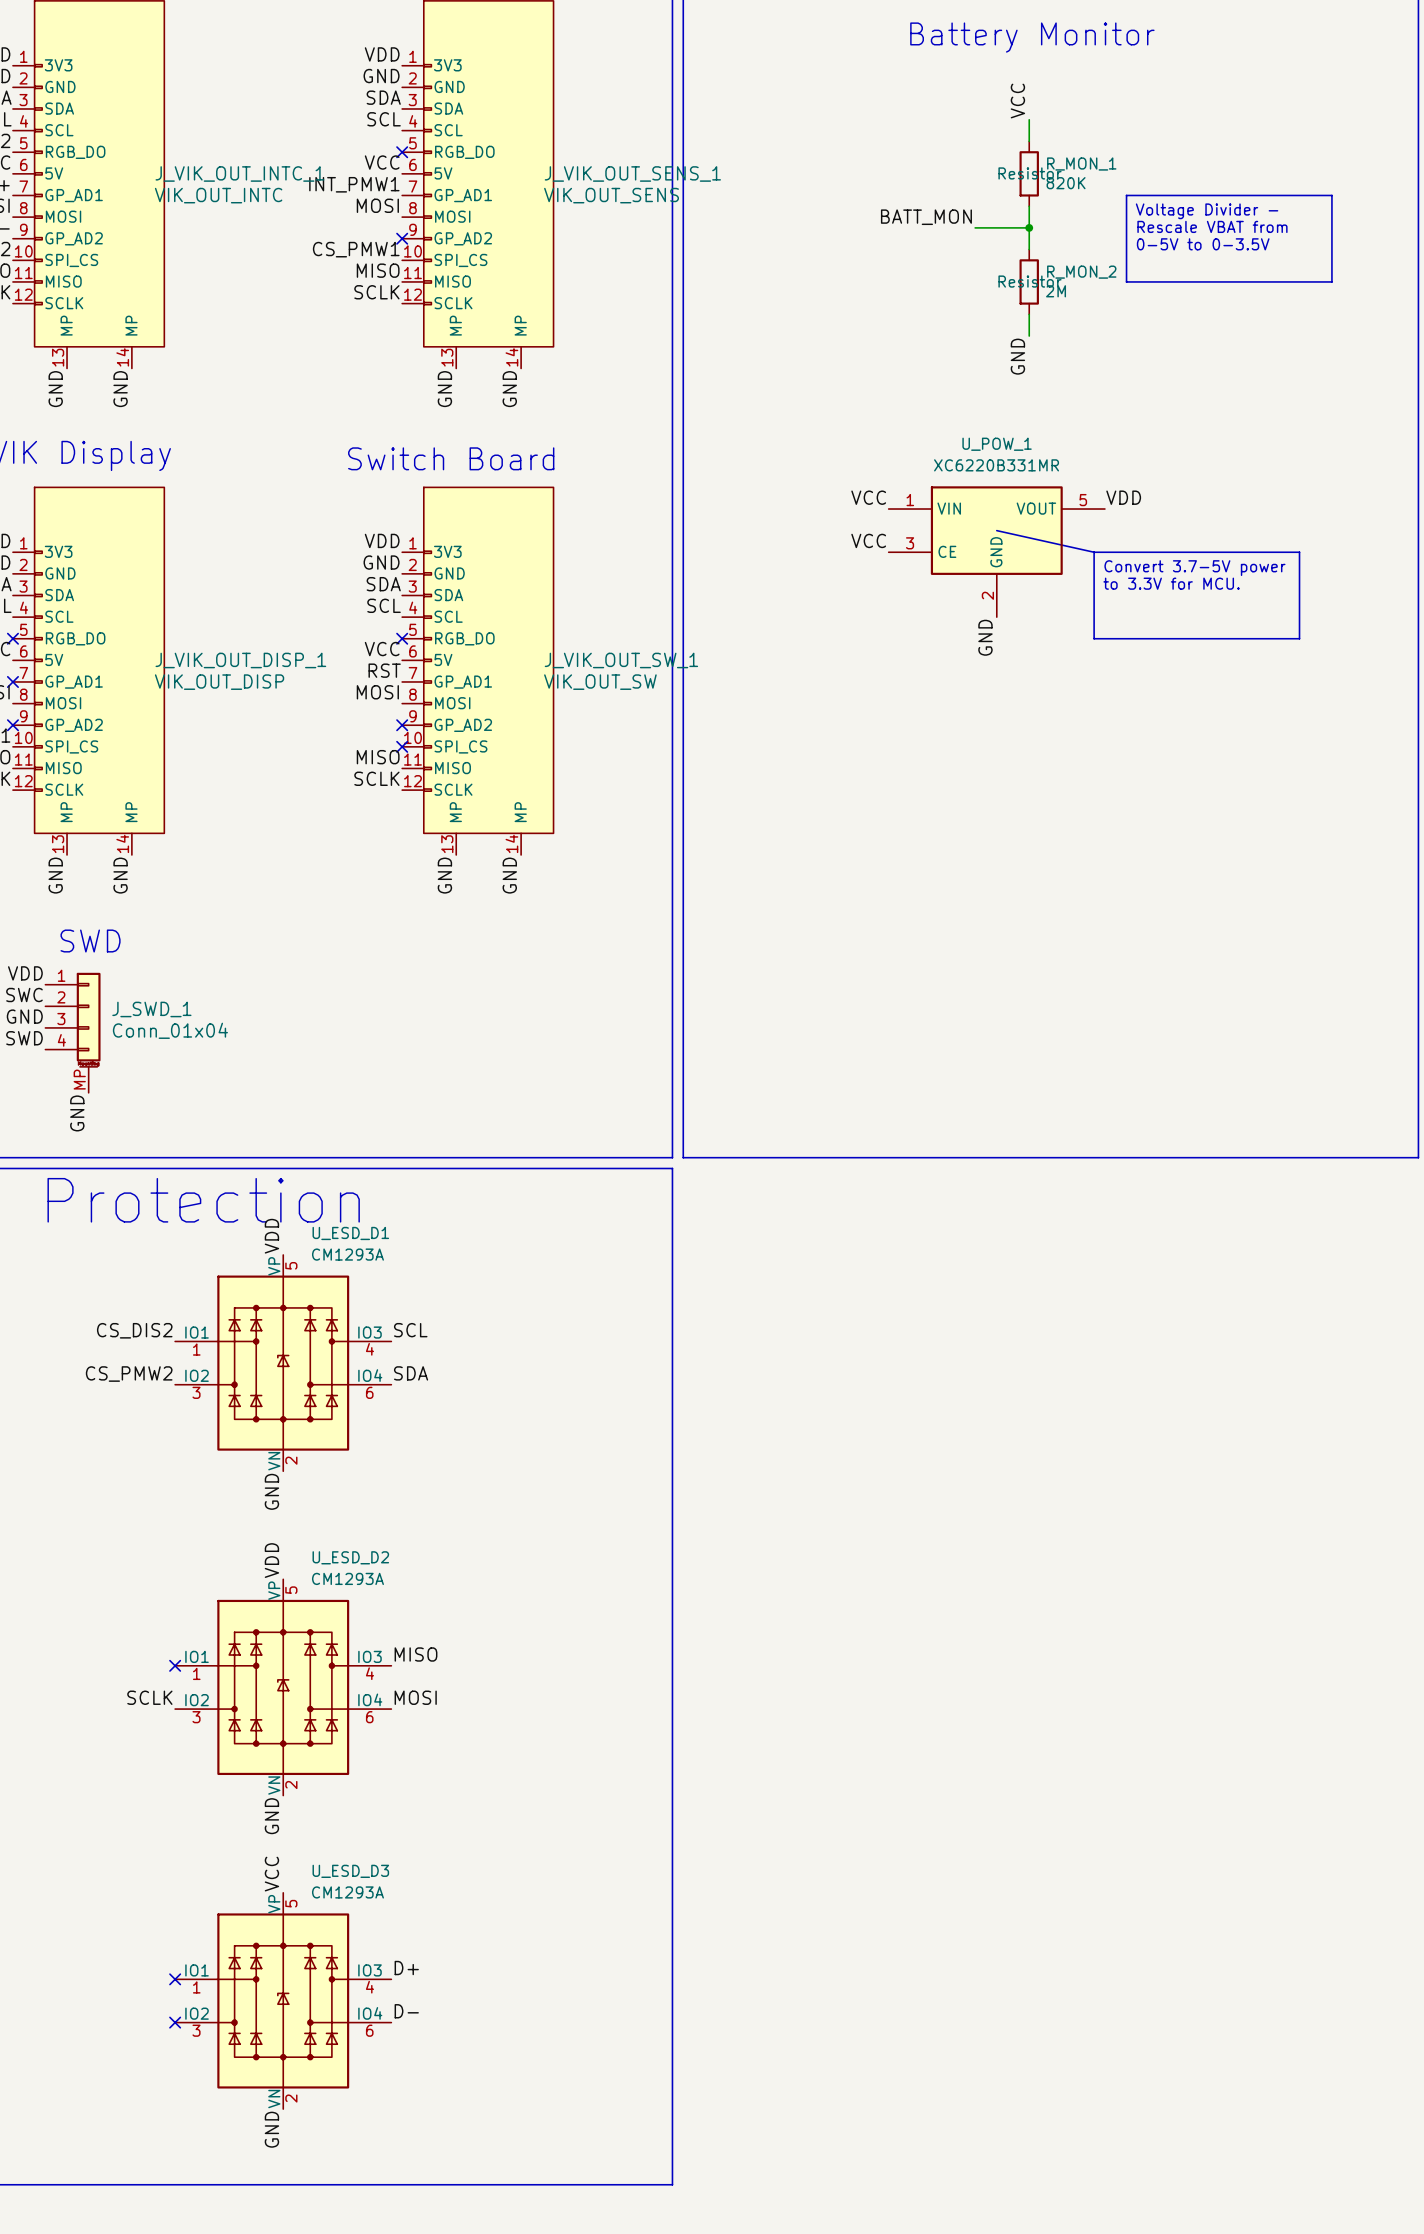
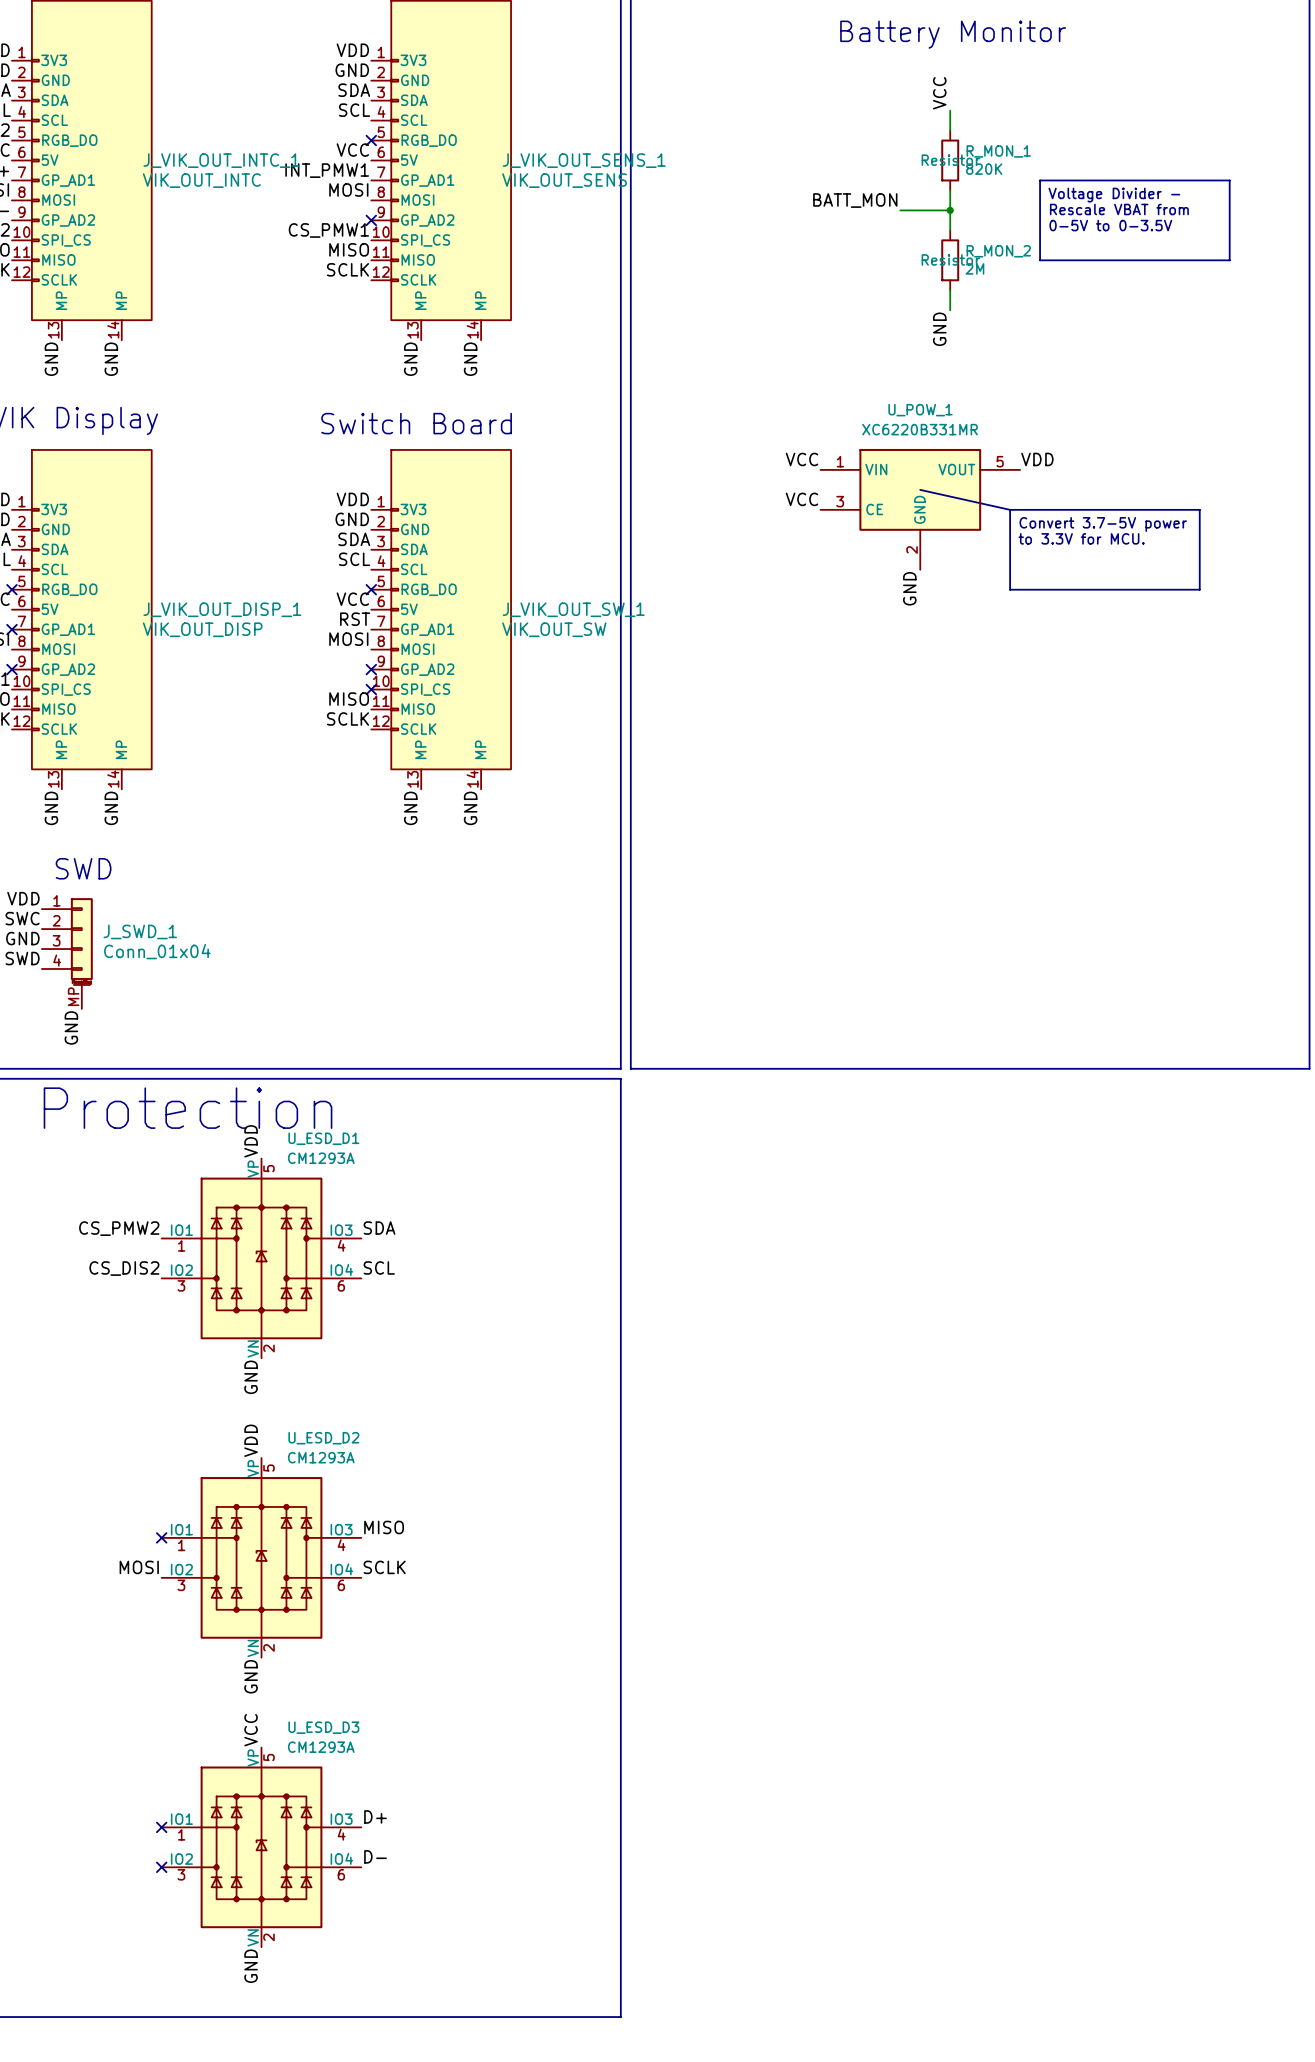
label: CS_DIS2 (134, 1330) -> CS_PMW2 (119, 1228)
label: SCL (410, 1330) -> SDA (379, 1228)
label: SDA (411, 1373) -> SCL (379, 1267)
label: CS_PMW2 (129, 1374) -> CS_DIS2 (124, 1268)
label: SCLK (149, 1697) -> MOSI (139, 1567)
label: MOSI (415, 1697) -> SCLK (384, 1567)

